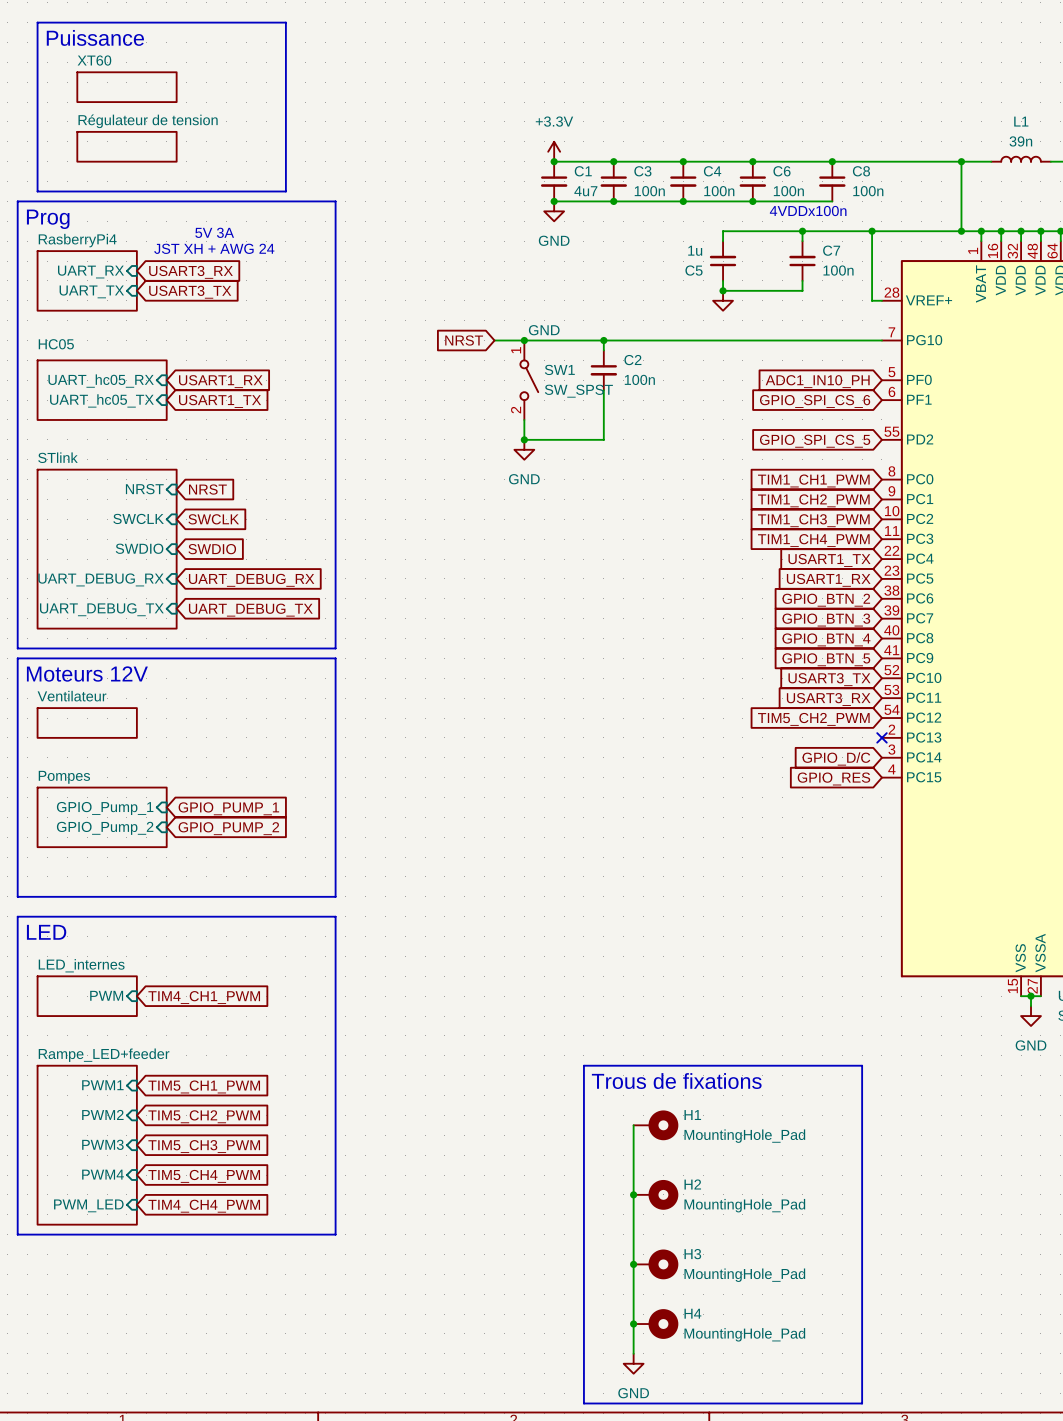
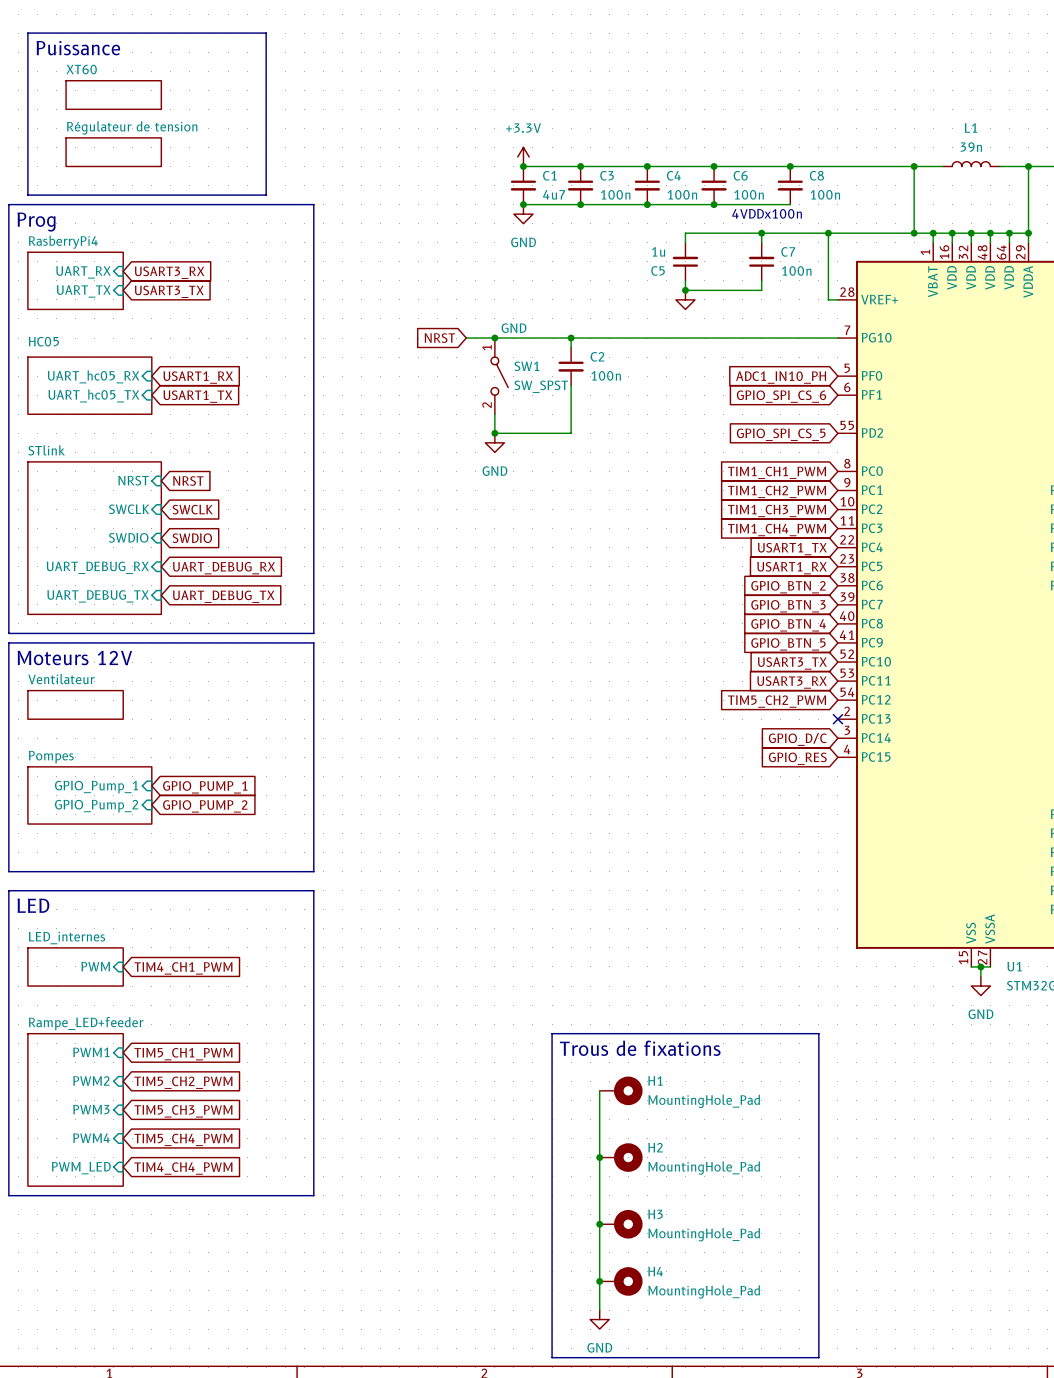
text: 5V 3A (214, 232) -> none
text: JST XH + AWG 24 (214, 248) -> none

